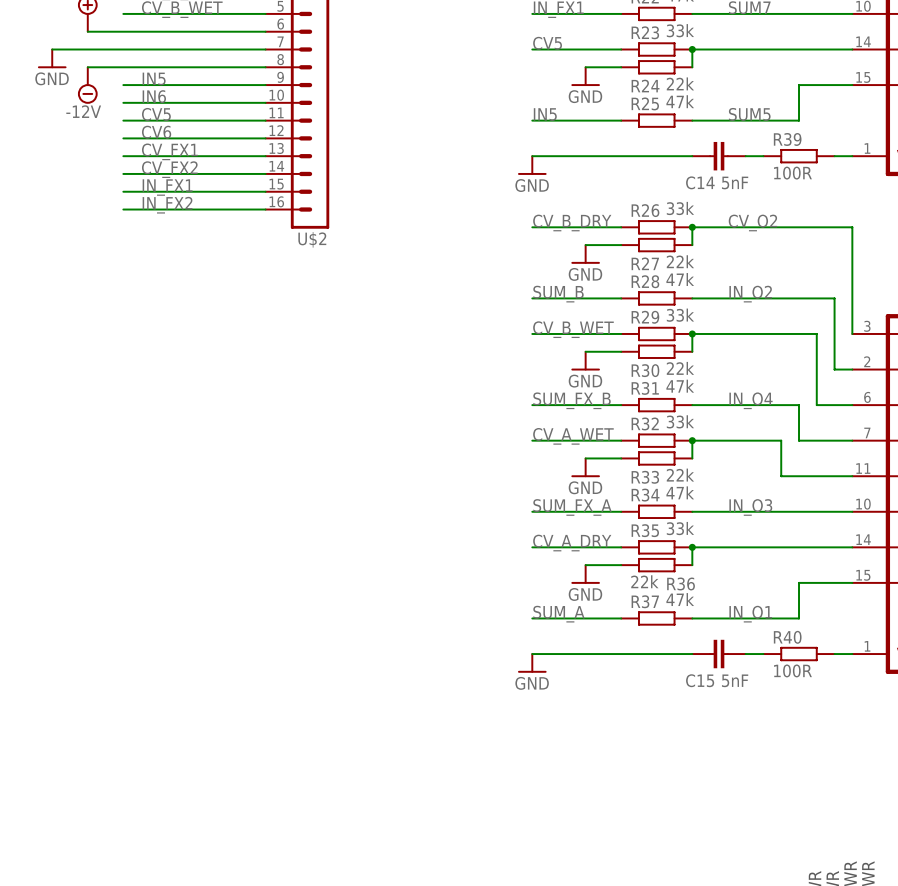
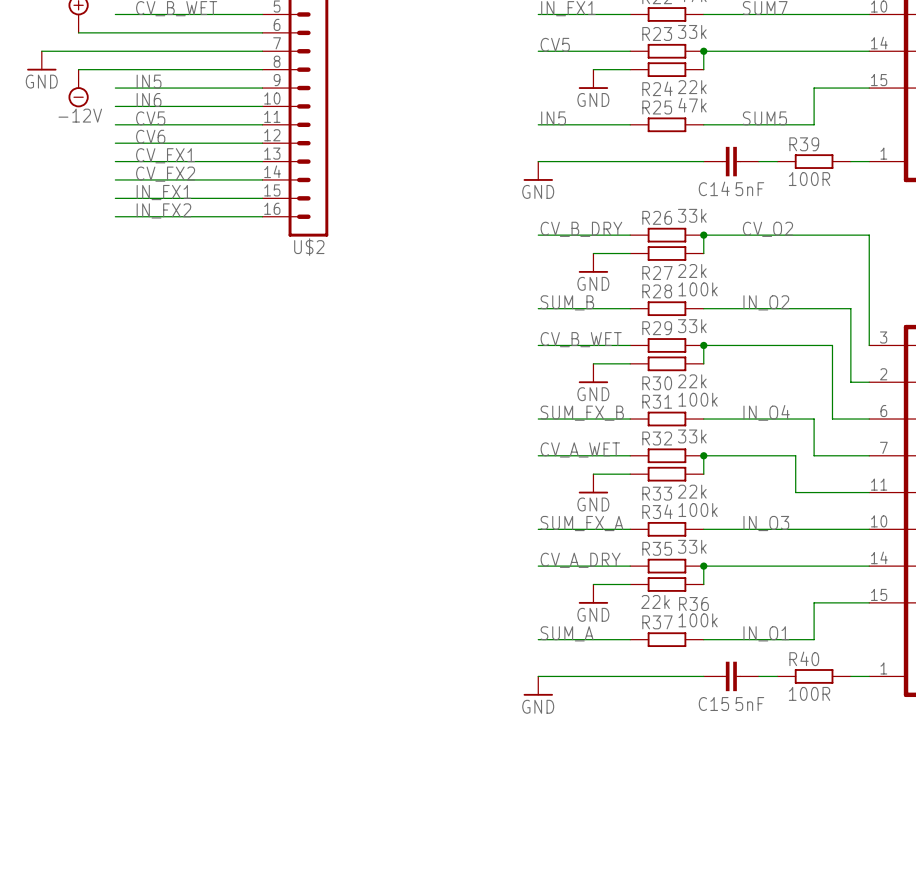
R28 value: 47k (680, 279) -> 100k (698, 289)
R31 value: 47k (680, 386) -> 100k (698, 399)
R34 value: 47k (680, 492) -> 100k (698, 510)
R37 value: 47k (680, 599) -> 100k (698, 620)

